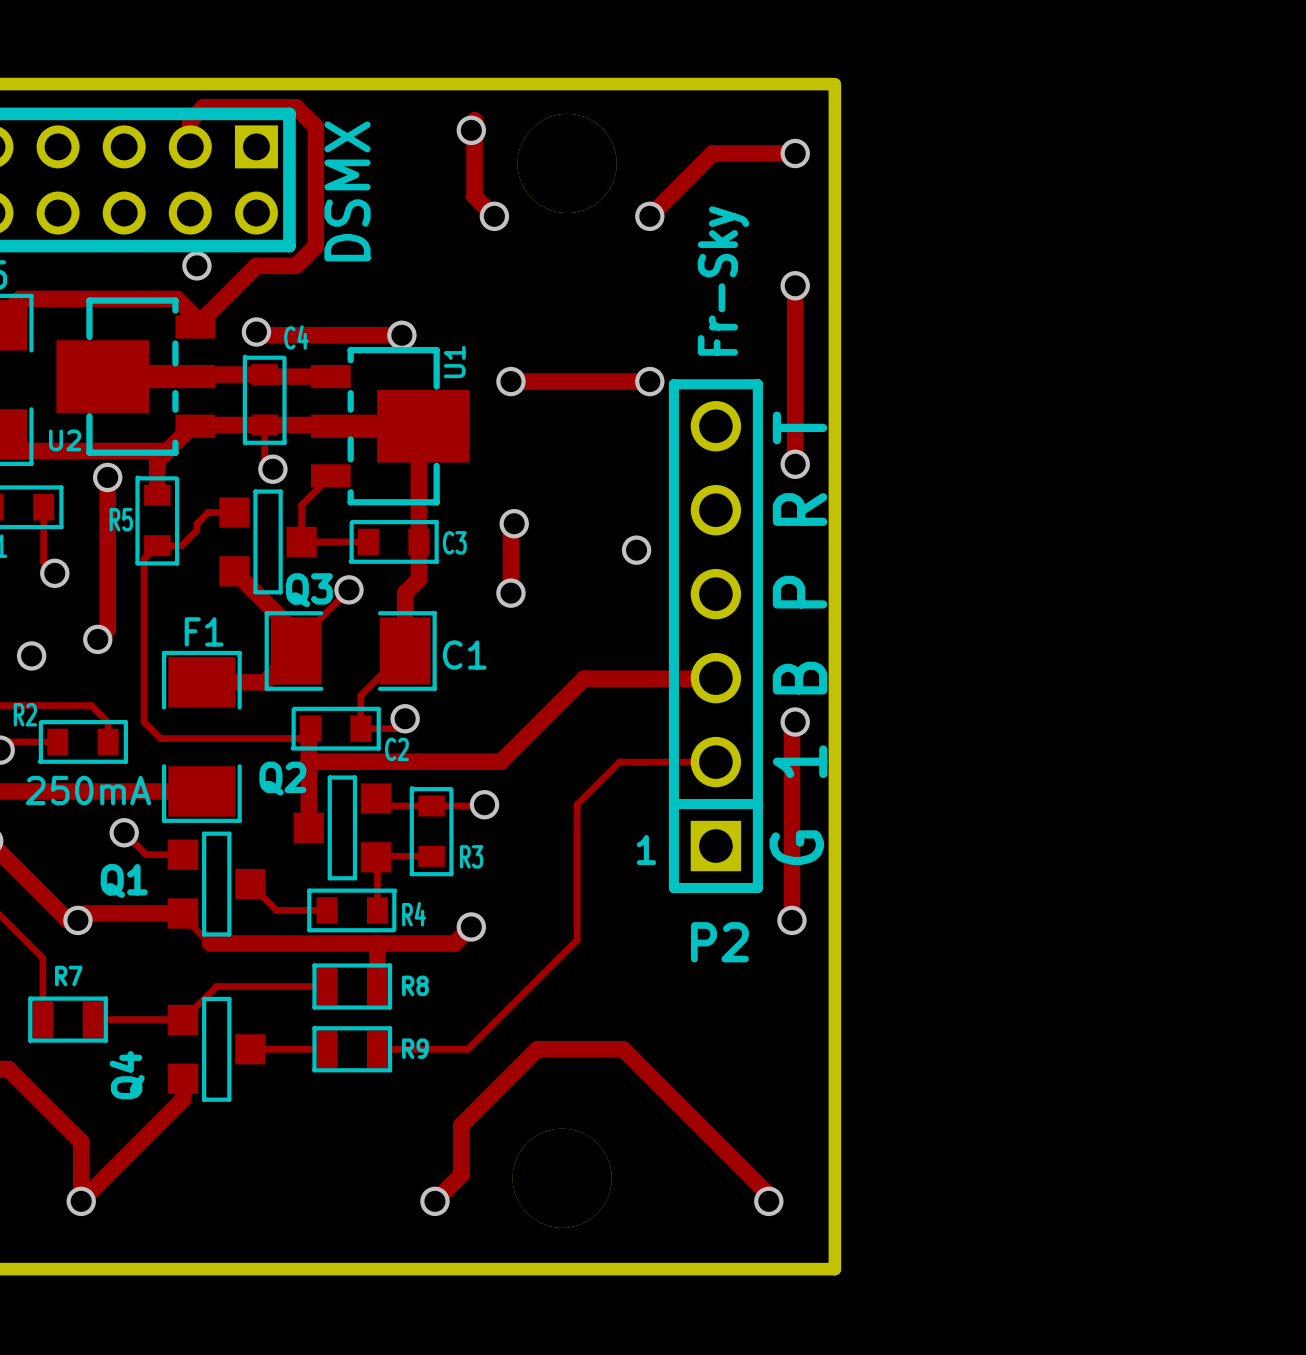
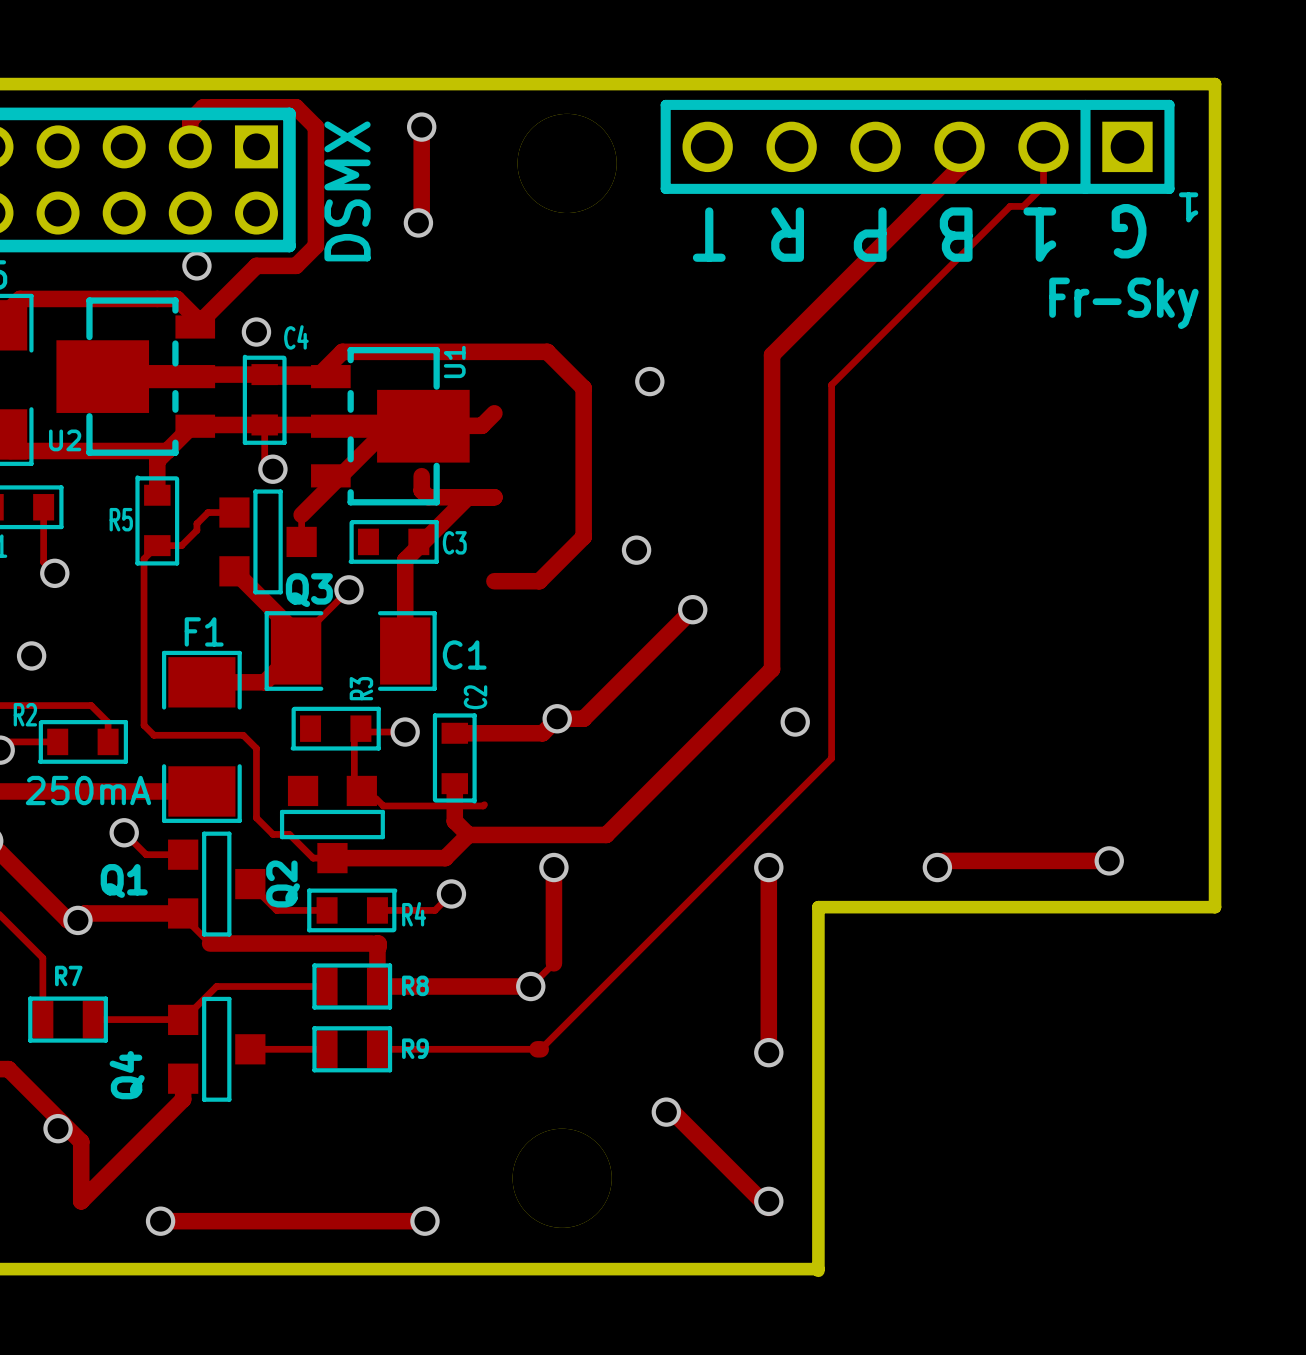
board edge: none -> (831, 84) (1215, 84) (1215, 907) (818, 907) (818, 1270)
board edge: (834, 84) (834, 1269) (818, 1269) -> none
track: none -> (421, 127) (421, 219) (418, 222)
track: (471, 130) (474, 120) (474, 196) (494, 216) -> none
via position: (471, 130) -> (421, 127)
part: none -> Fr-Sky (917, 146)
track: none -> (959, 146) (959, 167) (772, 355) (772, 669) (606, 834) (468, 834)
track: (795, 153) (712, 153) (649, 216) -> none
via: (795, 153) -> none
text: none -> 1 (1188, 207)
via: (494, 216) -> none
via: (649, 216) -> none
via: none -> (418, 222)
text: none -> 1 (1039, 234)
track: (795, 285) (795, 464) -> none
via: (795, 285) -> none
track: (259, 335) (401, 335) -> none
via: (401, 335) -> none
track: none -> (264, 374) (319, 374) (342, 351) (547, 351) (583, 388) (583, 536) (539, 581) (494, 581)
track: (510, 381) (649, 381) -> none
via: (510, 381) -> none
track: (423, 426) (418, 430) (418, 579) (405, 593) -> (468, 497) (405, 560) (405, 593)
text rotation: 0° (800, 427) -> 90° counterclockwise (709, 234)
text position: T (800, 427) -> T (709, 234)
via: (795, 464) -> none
track: (330, 475) (301, 505) (301, 514) -> (494, 413) (481, 425) (390, 425) (301, 514)
track: none -> (421, 476) (421, 490) (428, 497) (494, 497)
track: (107, 477) (107, 629) (97, 639) -> none
via: (107, 477) -> none
text rotation: 0° (800, 509) -> 90° counterclockwise (787, 234)
text position: R (800, 509) -> R (787, 234)
track: (514, 523) (510, 523) (510, 593) -> none
via: (514, 523) -> none
track: (301, 541) (368, 541) -> none
text rotation: 0° (800, 592) -> 90° counterclockwise (870, 234)
text position: P (800, 592) -> P (870, 234)
via: (510, 593) -> none
track: none -> (692, 609) (583, 718) (557, 718) (542, 733) (454, 733)
via: none -> (692, 609)
P2: Fr-Sky (715, 636) -> none
via: (97, 639) -> none
track: (405, 650) (360, 695) (360, 728) (395, 728) (405, 718) -> none
track: (715, 678) (584, 678) (501, 761) (308, 761) -> none
text rotation: 0° (800, 678) -> 90° counterclockwise (956, 234)
text position: B (800, 678) -> B (956, 234)
via position: (405, 718) -> (405, 732)
via: none -> (557, 718)
track: (144, 722) (160, 738) (300, 738) (310, 728) (312, 730) -> (144, 722) (144, 725) (153, 735) (243, 735) (256, 748) (256, 817) (273, 834) (289, 834) (313, 858) (445, 858) (468, 834)
track: (795, 722) (791, 725) (791, 920) -> none
track: (308, 730) (308, 827) -> none
track: none -> (405, 732) (354, 732) (354, 783) (361, 790)
C2 name: C2 (396, 749) -> R3 (361, 688)
C2: none -> (454, 758)
text: 1 (800, 761) -> none
track: (715, 762) (619, 762) (577, 804) (577, 940) (553, 963) -> (553, 867) (553, 963)
track: none -> (454, 783) (454, 821) (468, 834)
via: (484, 804) -> none
Q2 rotation: 0° (342, 827) -> 90° counterclockwise (332, 824)
R3: (431, 831) -> none
text rotation: 0° (796, 847) -> 90° counterclockwise (1129, 231)
text position: G (796, 847) -> G (1129, 231)
text: 1 (646, 850) -> none
track: (431, 856) (379, 856) (377, 858) (377, 910) -> (451, 893) (434, 910) (377, 910)
track: none -> (1109, 860) (944, 860) (937, 867)
via: none -> (1109, 860)
via: none -> (553, 867)
track: none -> (768, 867) (768, 1052)
via: none -> (937, 867)
via position: (791, 920) -> (768, 867)
track: (471, 926) (454, 943) (372, 943) -> none
via position: (471, 926) -> (451, 893)
track: none -> (377, 986) (530, 986)
track: (530, 986) (467, 1049) -> (537, 1049) (467, 1049)
via: none -> (530, 986)
track: (537, 1049) (461, 1125) (461, 1174) (434, 1201) -> none
track: (540, 1049) (623, 1049) (768, 1194) (768, 1201) -> (540, 1049) (831, 758) (831, 384) (1010, 206) (1023, 206) (1043, 186) (1043, 146)
via: none -> (768, 1052)
track: none -> (666, 1112) (672, 1112) (768, 1207)
via: none -> (666, 1112)
via: none -> (58, 1128)
via: (81, 1201) -> none
via position: (434, 1201) -> (424, 1221)
track: none -> (160, 1221) (424, 1221)
via: none -> (160, 1221)

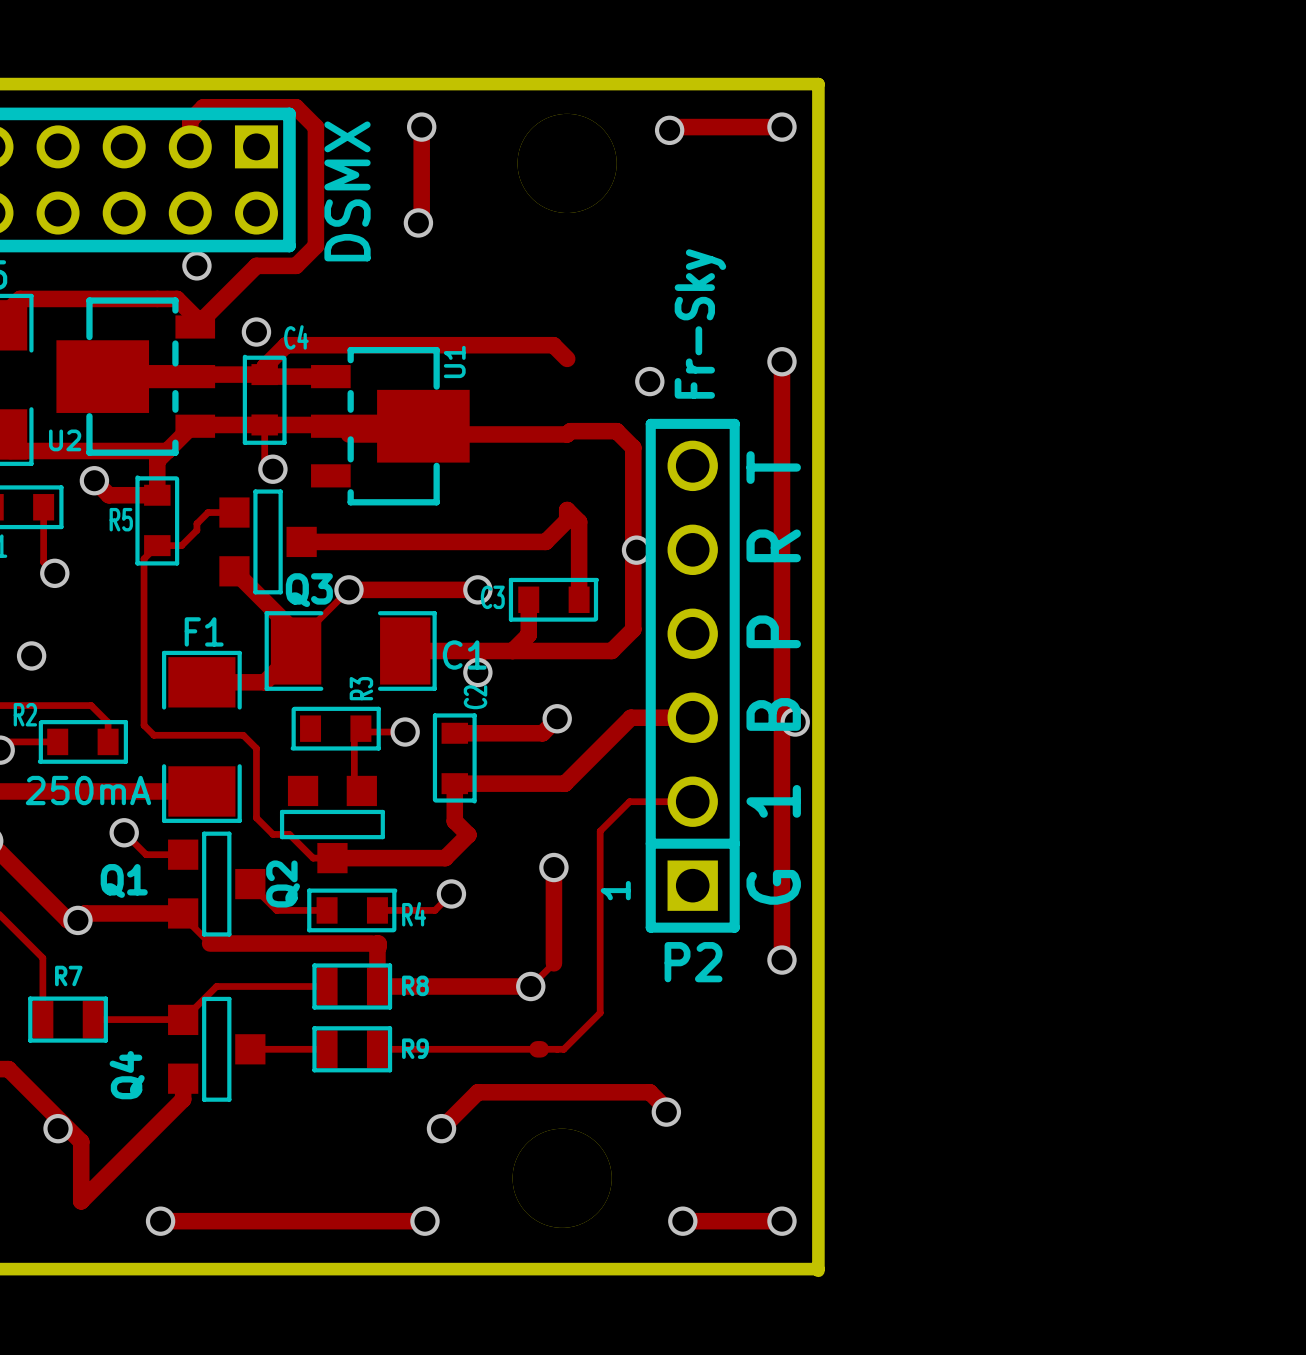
board edge: (818, 84) (1215, 84) (1215, 907) (818, 907) -> (818, 84) (818, 907)
track: none -> (781, 127) (672, 127) (669, 130)
via: none -> (781, 127)
via: none -> (669, 130)
part: Fr-Sky (917, 146) -> none
track: (959, 146) (959, 167) (772, 355) (772, 669) (606, 834) (468, 834) -> none
track: (1043, 146) (1043, 186) (1023, 206) (1010, 206) (831, 384) (831, 758) (540, 1049) -> (692, 801) (629, 801) (600, 831) (600, 1012) (563, 1049) (540, 1049)
text: 1 (1188, 207) -> none
text rotation: 0° (1129, 231) -> 90° clockwise (773, 887)
text position: G (1129, 231) -> G (773, 887)
text rotation: 0° (709, 234) -> 90° clockwise (773, 467)
text position: T (709, 234) -> T (773, 467)
text rotation: 0° (787, 234) -> 90° clockwise (773, 545)
text position: R (787, 234) -> R (773, 545)
text rotation: 0° (870, 234) -> 90° clockwise (773, 631)
text position: P (870, 234) -> P (773, 631)
text rotation: 0° (956, 234) -> 90° clockwise (773, 714)
text position: B (956, 234) -> B (773, 714)
text: 1 (1039, 234) -> none
track: none -> (781, 361) (781, 960)
via: none -> (781, 361)
track: (264, 374) (319, 374) (342, 351) (547, 351) (583, 388) (583, 536) (539, 581) (494, 581) -> (264, 374) (264, 366) (286, 345) (553, 345) (567, 358)
track: (494, 413) (481, 425) (390, 425) (301, 514) (301, 541) -> (579, 599) (579, 521) (567, 510) (567, 520) (545, 541) (301, 541)
track: (421, 476) (421, 490) (428, 497) (494, 497) -> none
track: none -> (94, 480) (108, 495) (157, 495)
via: none -> (94, 480)
track: (468, 497) (405, 560) (405, 650) -> (348, 434) (567, 434) (570, 431) (616, 431) (633, 447) (633, 629) (611, 650) (405, 650)
C3 rotation: 0° (393, 541) -> 180° (553, 599)
C3 position: (393, 541) -> (553, 599)
track: none -> (352, 589) (477, 589)
via: none -> (477, 589)
track: none -> (528, 599) (528, 634) (512, 650)
track: (692, 609) (583, 718) (557, 718) -> none
via: (692, 609) -> none
via: none -> (477, 672)
P2: none -> Fr-Sky (692, 675)
track: none -> (692, 717) (630, 717) (565, 783) (454, 783)
track: (375, 798) (383, 805) (484, 804) -> none
text: none -> 1 (773, 801)
track: (1109, 860) (944, 860) (937, 867) -> none
via: (1109, 860) -> none
track: (768, 867) (768, 1052) -> none
via: (768, 867) -> none
via: (937, 867) -> none
text: none -> 1 (615, 890)
via: none -> (781, 960)
via: (768, 1052) -> none
track: (666, 1112) (672, 1112) (768, 1207) -> none
track: none -> (669, 1112) (649, 1092) (477, 1092) (441, 1128)
via: none -> (441, 1128)
via position: (768, 1201) -> (781, 1221)
track: none -> (682, 1221) (781, 1221)
via: none -> (682, 1221)

